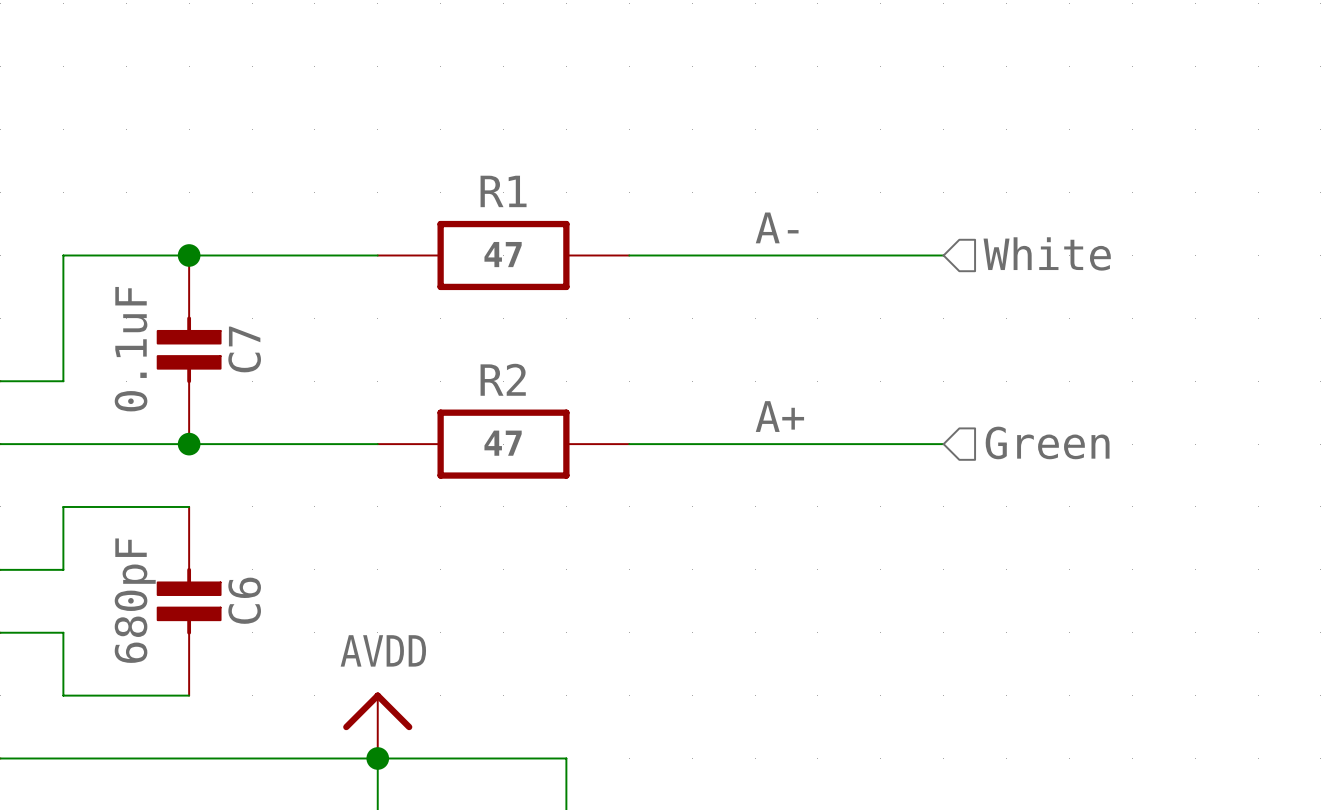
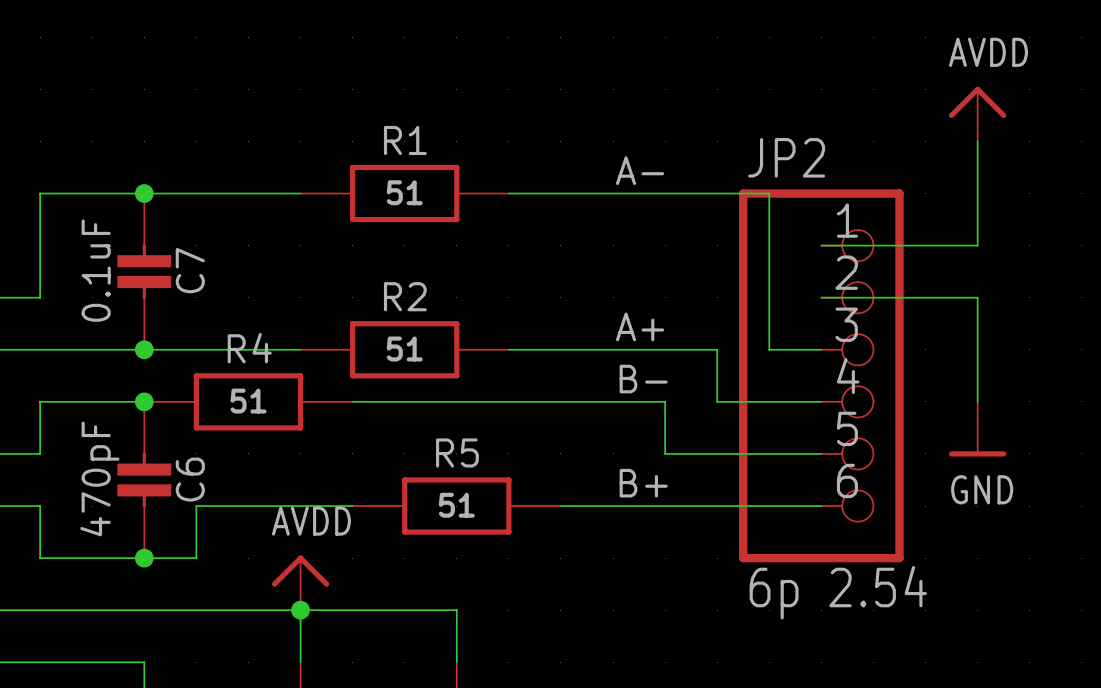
power symbol: none -> AVDD (977, 114)
wire: none -> (977, 141) (977, 245) (821, 245)
hierarchical label: White (1047, 253) -> none
R1 value: 47 (503, 254) -> 51 (404, 192)
wire: none -> (769, 193) (769, 349) (821, 349)
wire: none -> (821, 297) (977, 297) (977, 401)
hierarchical label: Green (1047, 442) -> none
R2 value: 47 (503, 443) -> 51 (404, 349)
wire: (880, 444) (943, 444) -> (717, 349) (717, 401) (821, 401)
JP2: none -> 6p 2.54 (821, 375)
label: none -> B- (643, 379)
junction: none -> (144, 401)
R4: none -> 51 (248, 401)
wire: none -> (352, 401) (665, 401) (665, 453) (821, 453)
power symbol: none -> GND (977, 429)
C6 value: 680pF (135, 600) -> 470pF (99, 478)
label: none -> B+ (643, 483)
wire: none -> (352, 506) (196, 506) (196, 558) (144, 558)
R5: none -> 51 (456, 506)
wire: none -> (560, 506) (821, 506)
junction: none -> (144, 558)

